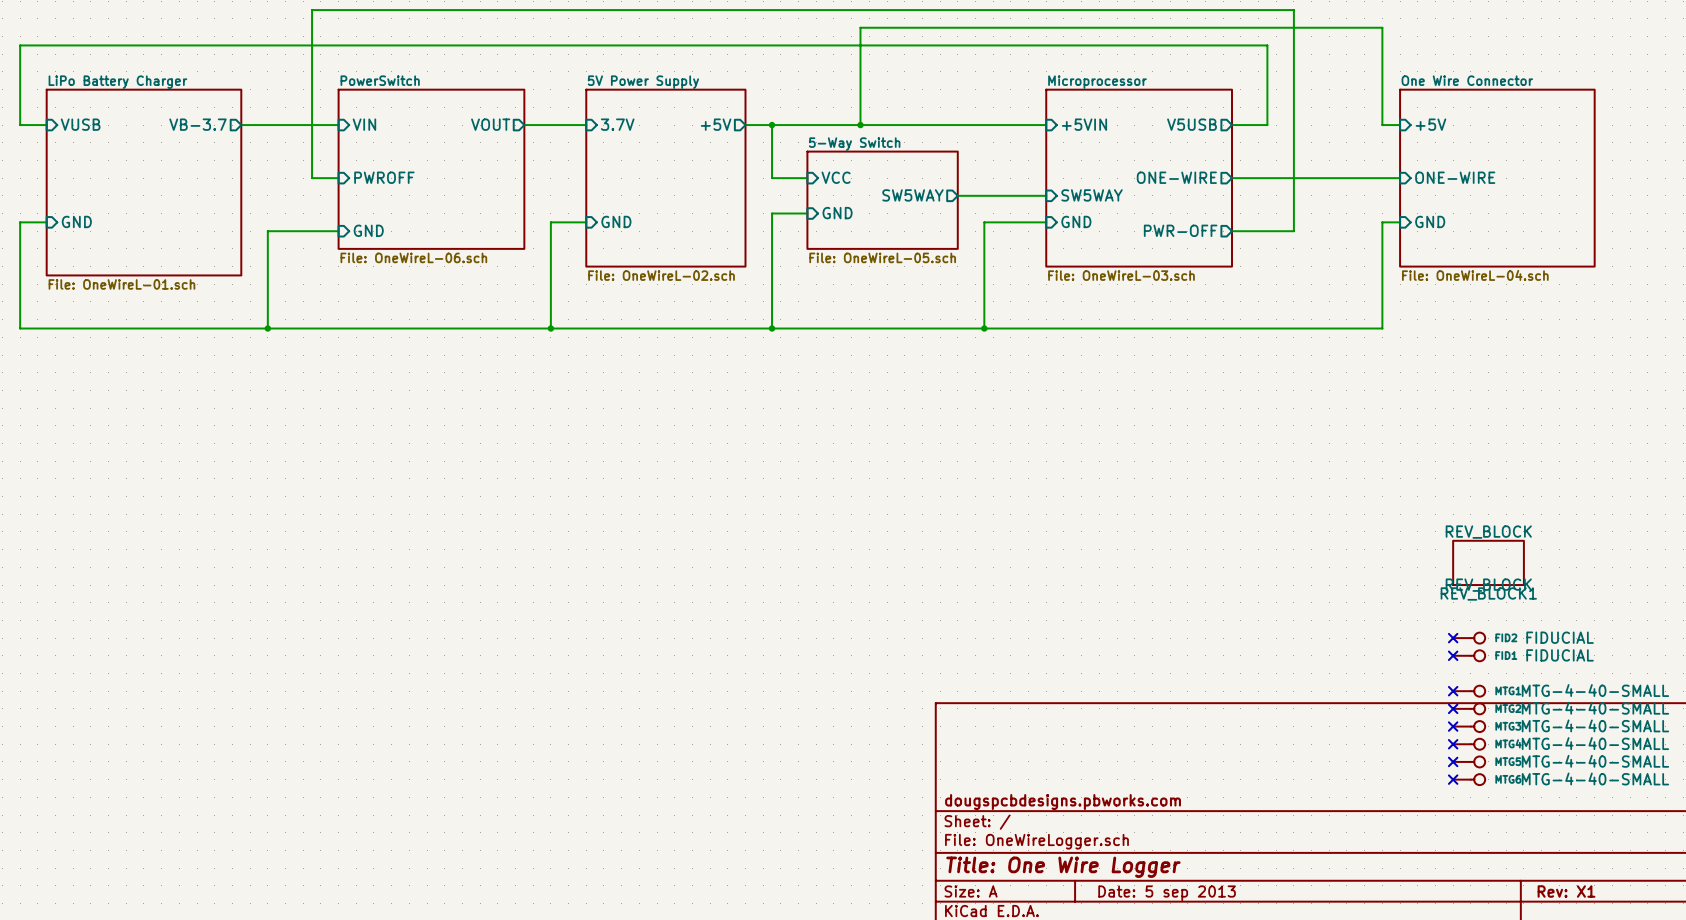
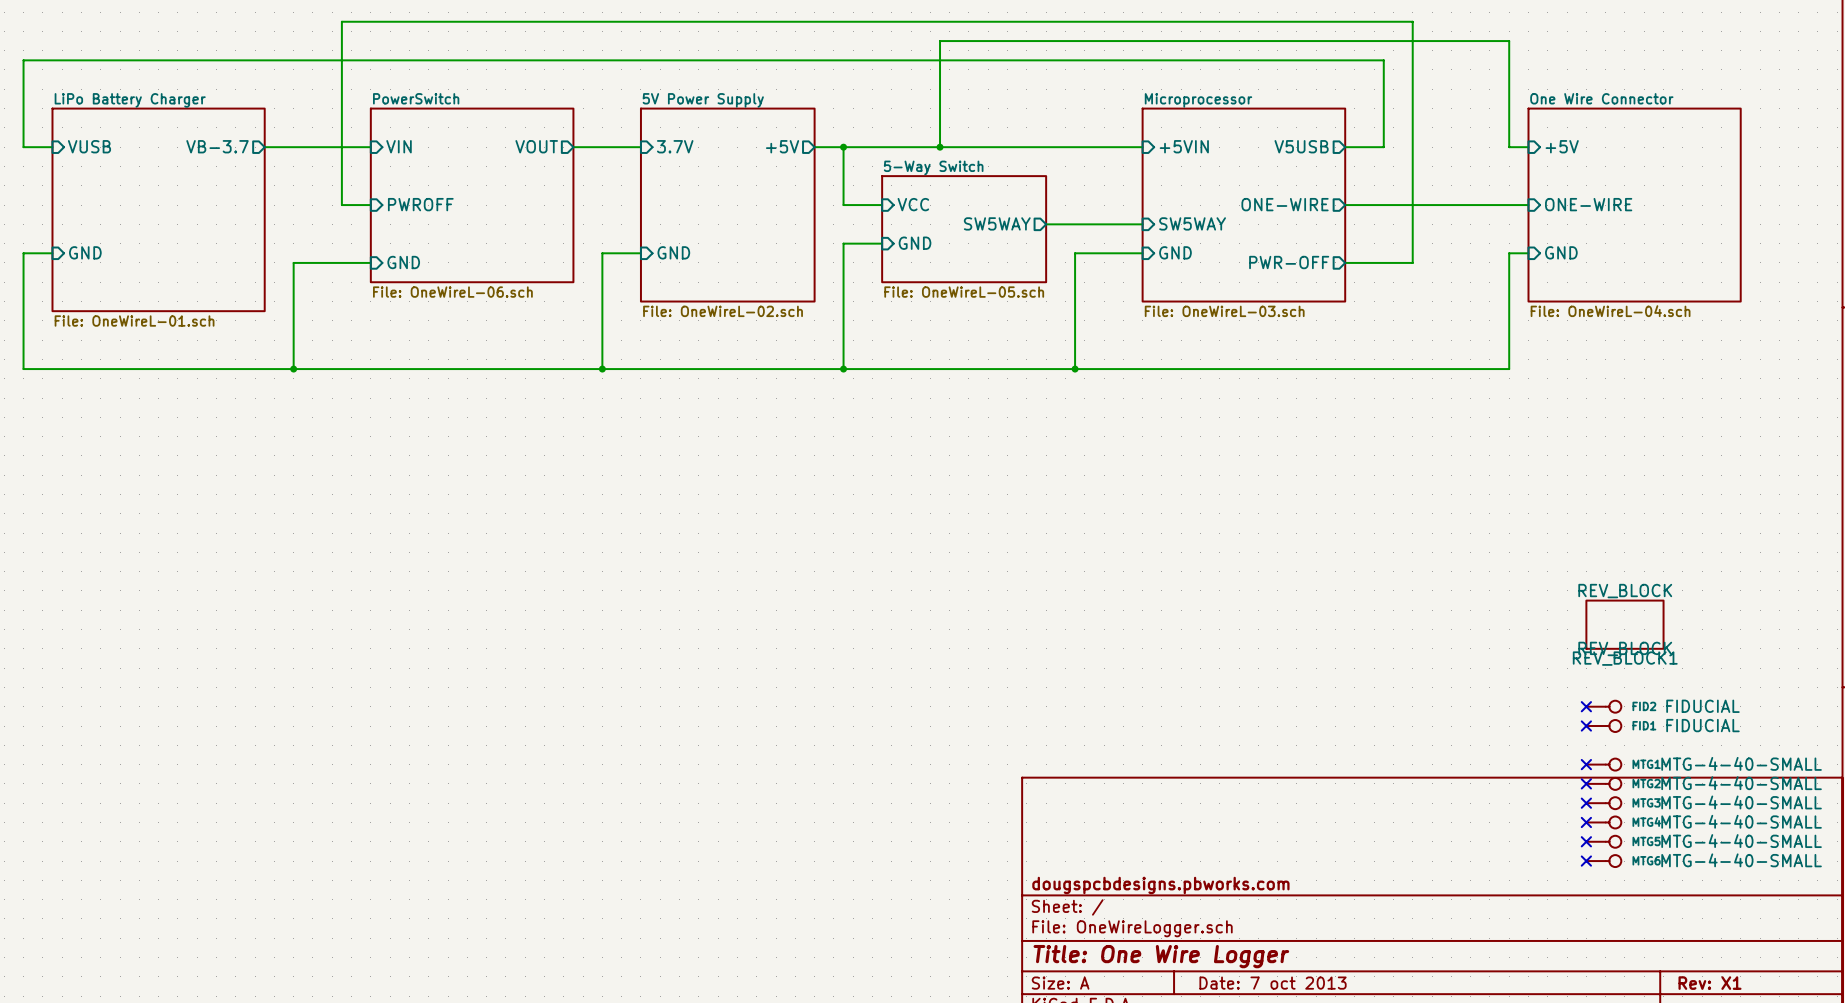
title block: Date: 5 sep 2013 (1167, 893) -> Date: 7 oct 2013 (1273, 983)

